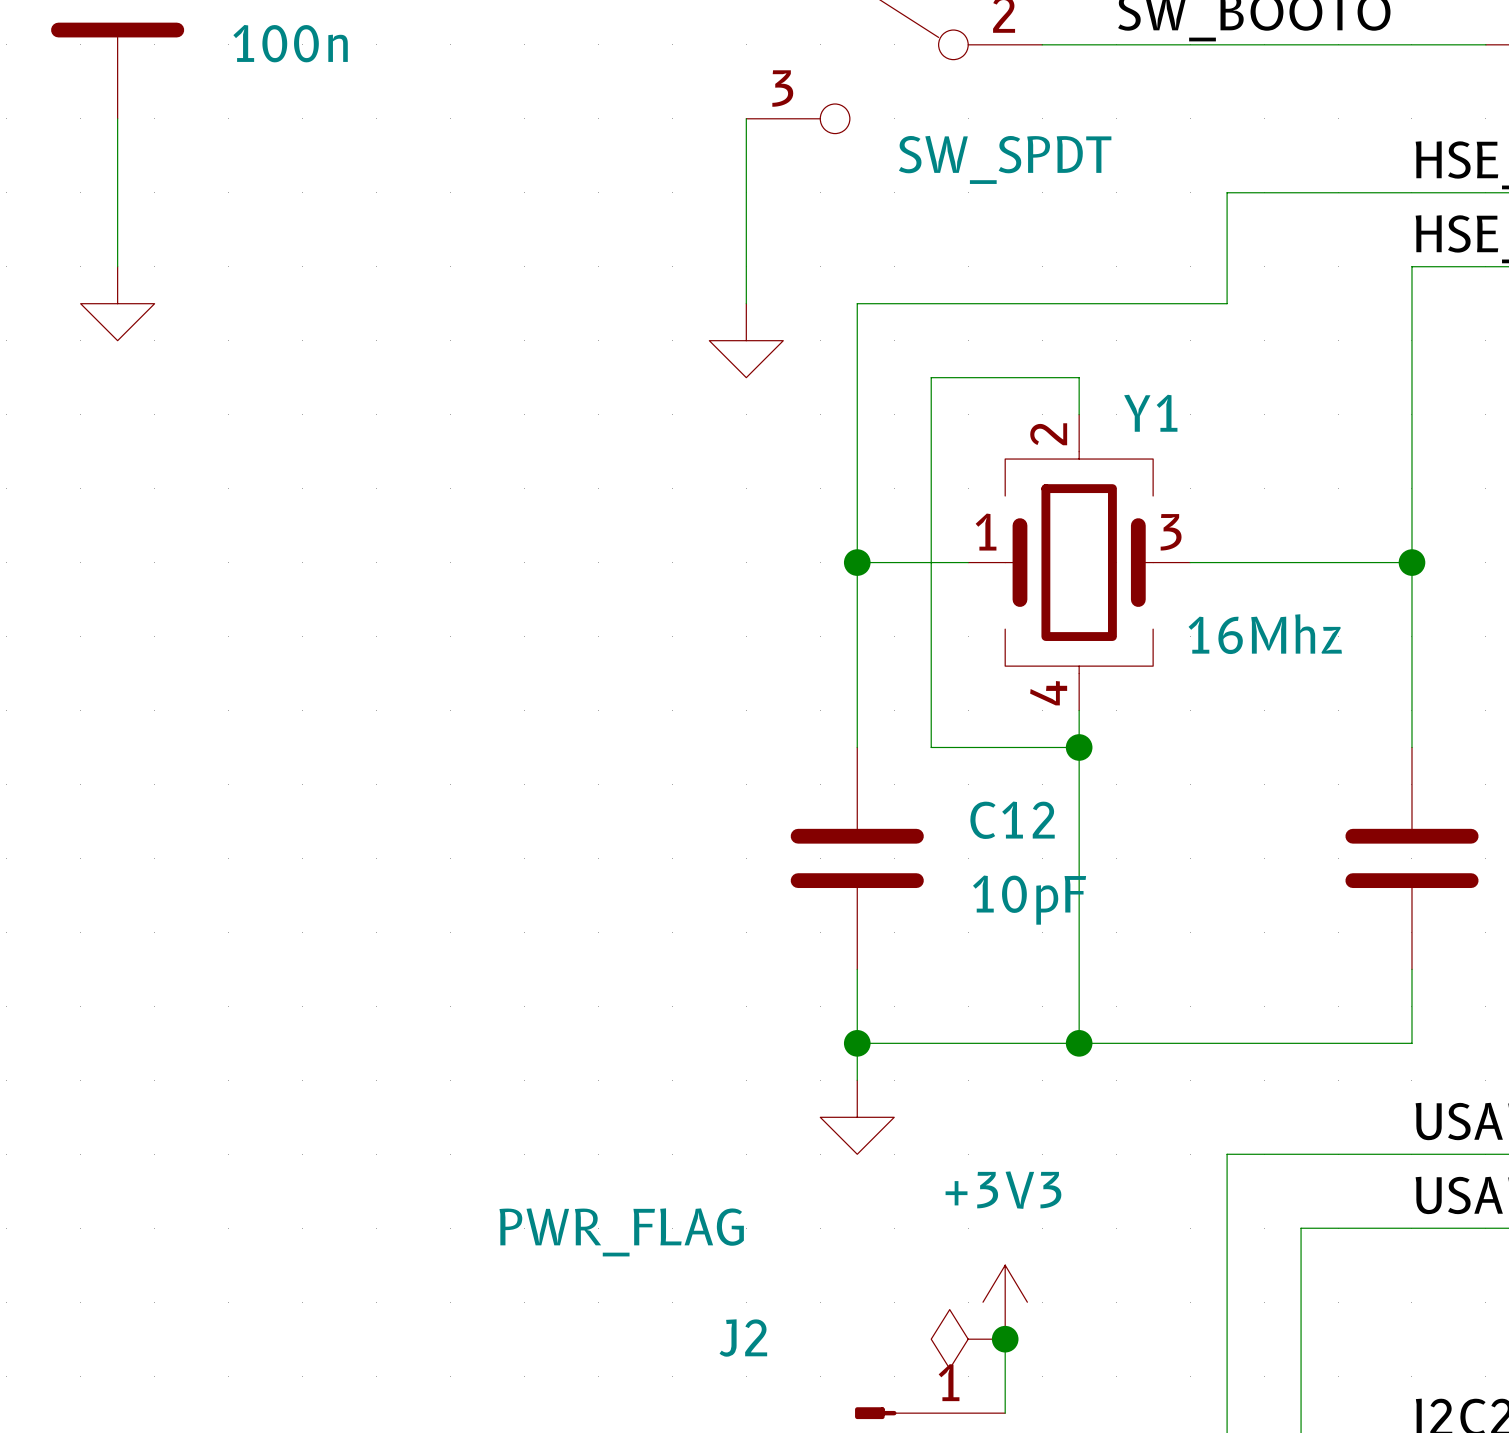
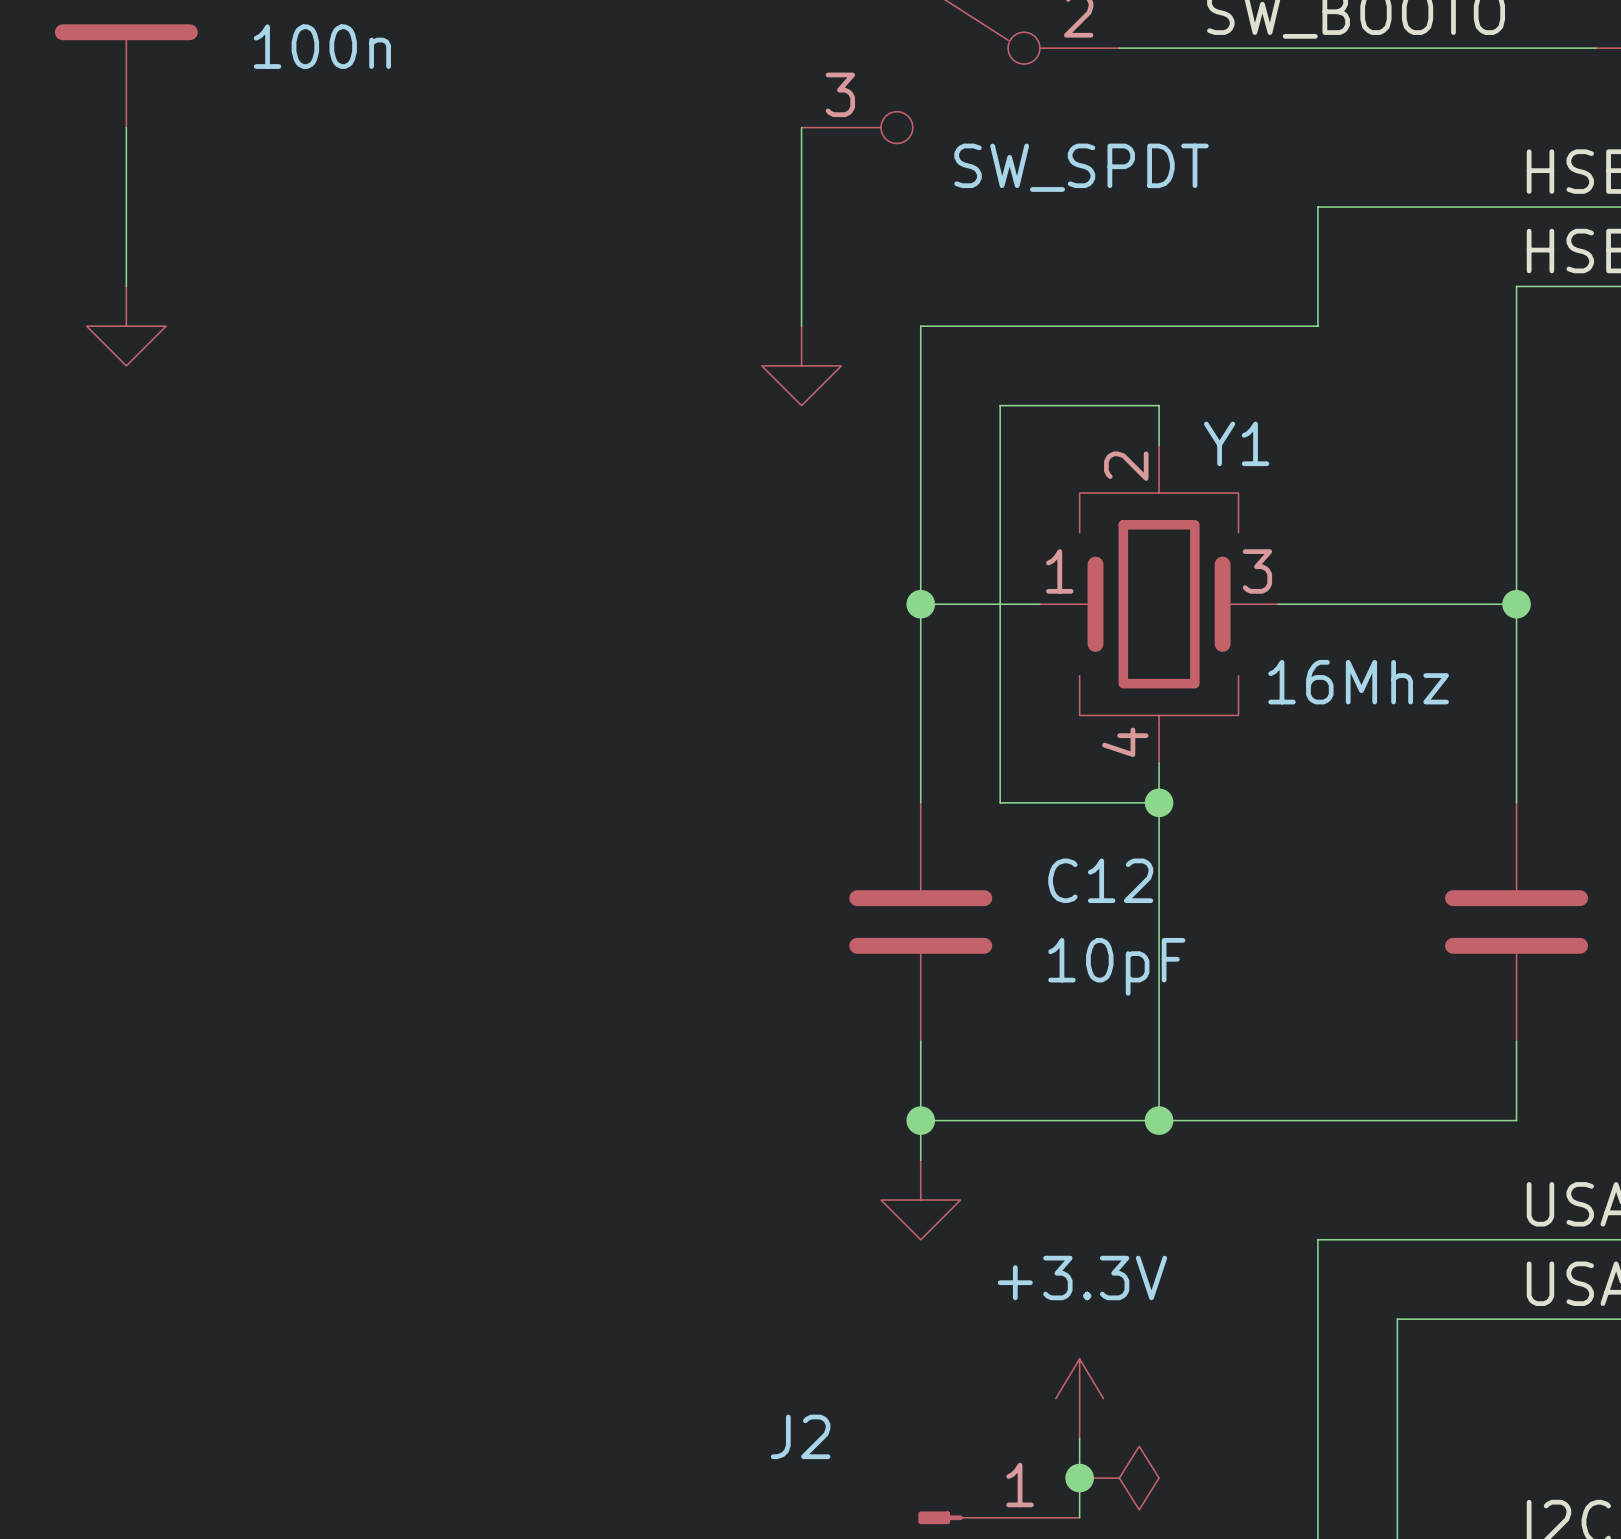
power symbol: +3V3 (1005, 1302) -> +3.3V (1079, 1398)
power symbol: PWR_FLAG (968, 1339) -> none
junction position: (1005, 1339) -> (1079, 1478)
power symbol: none -> (1119, 1478)

